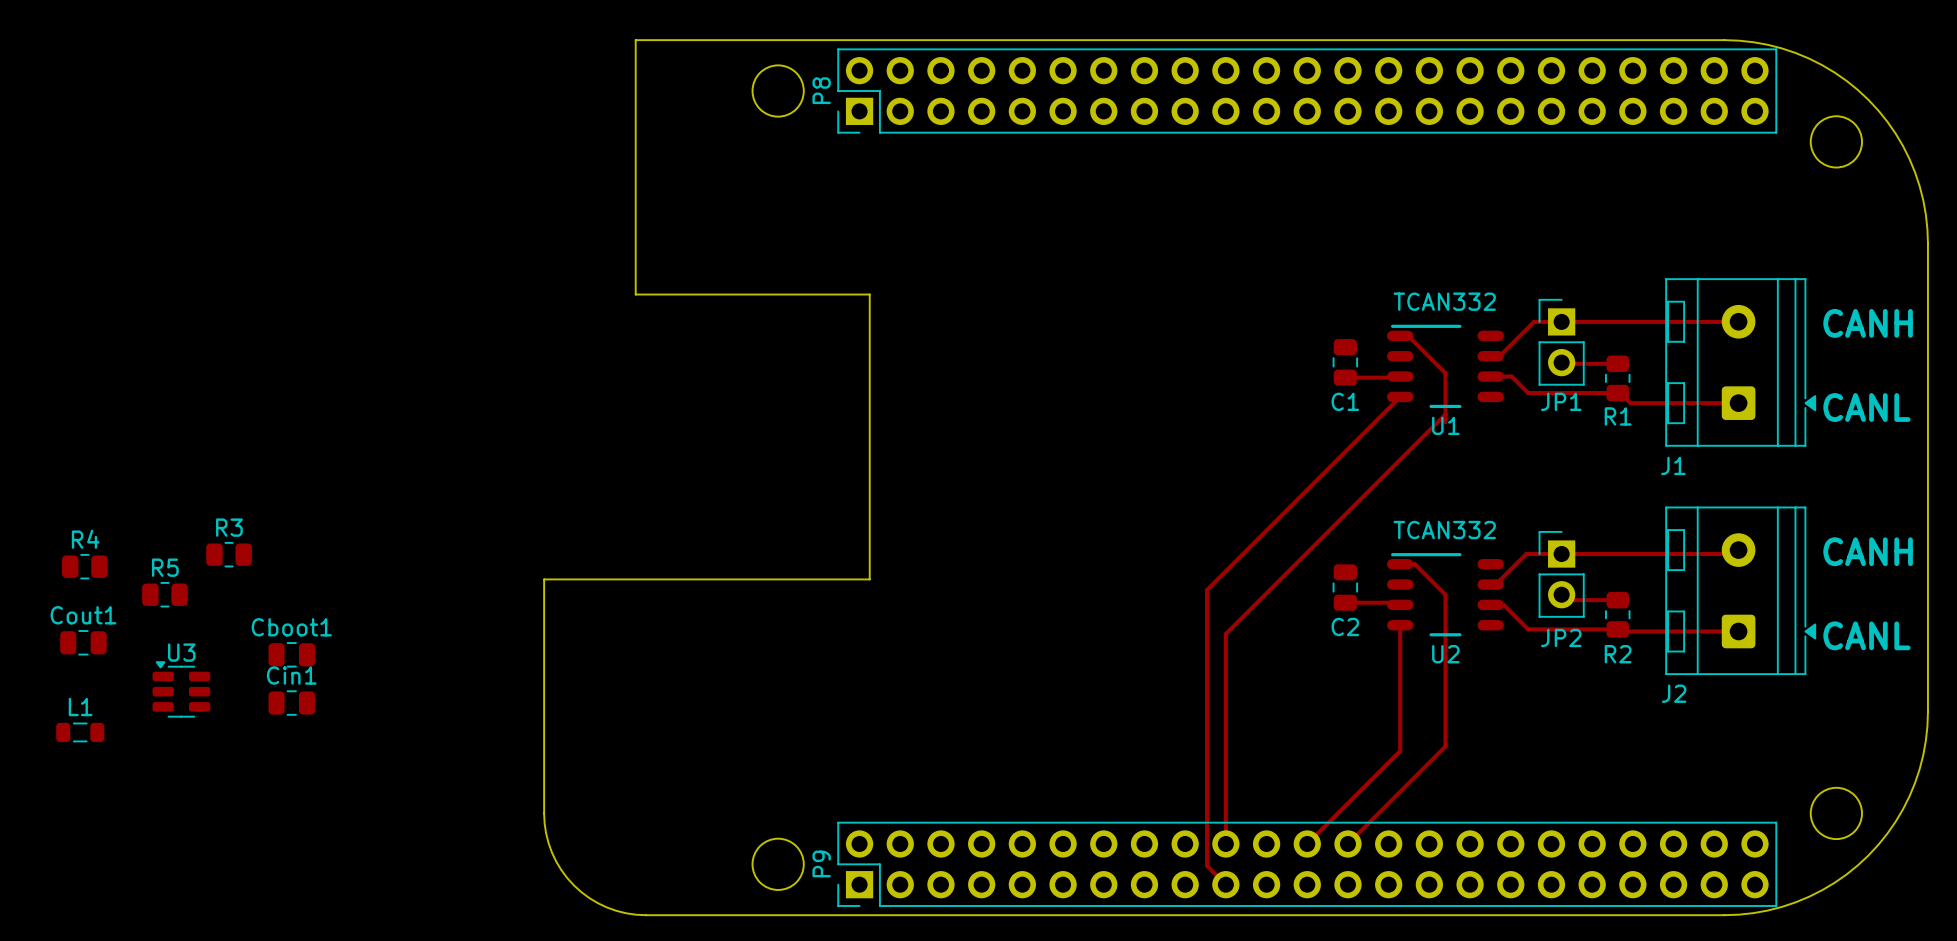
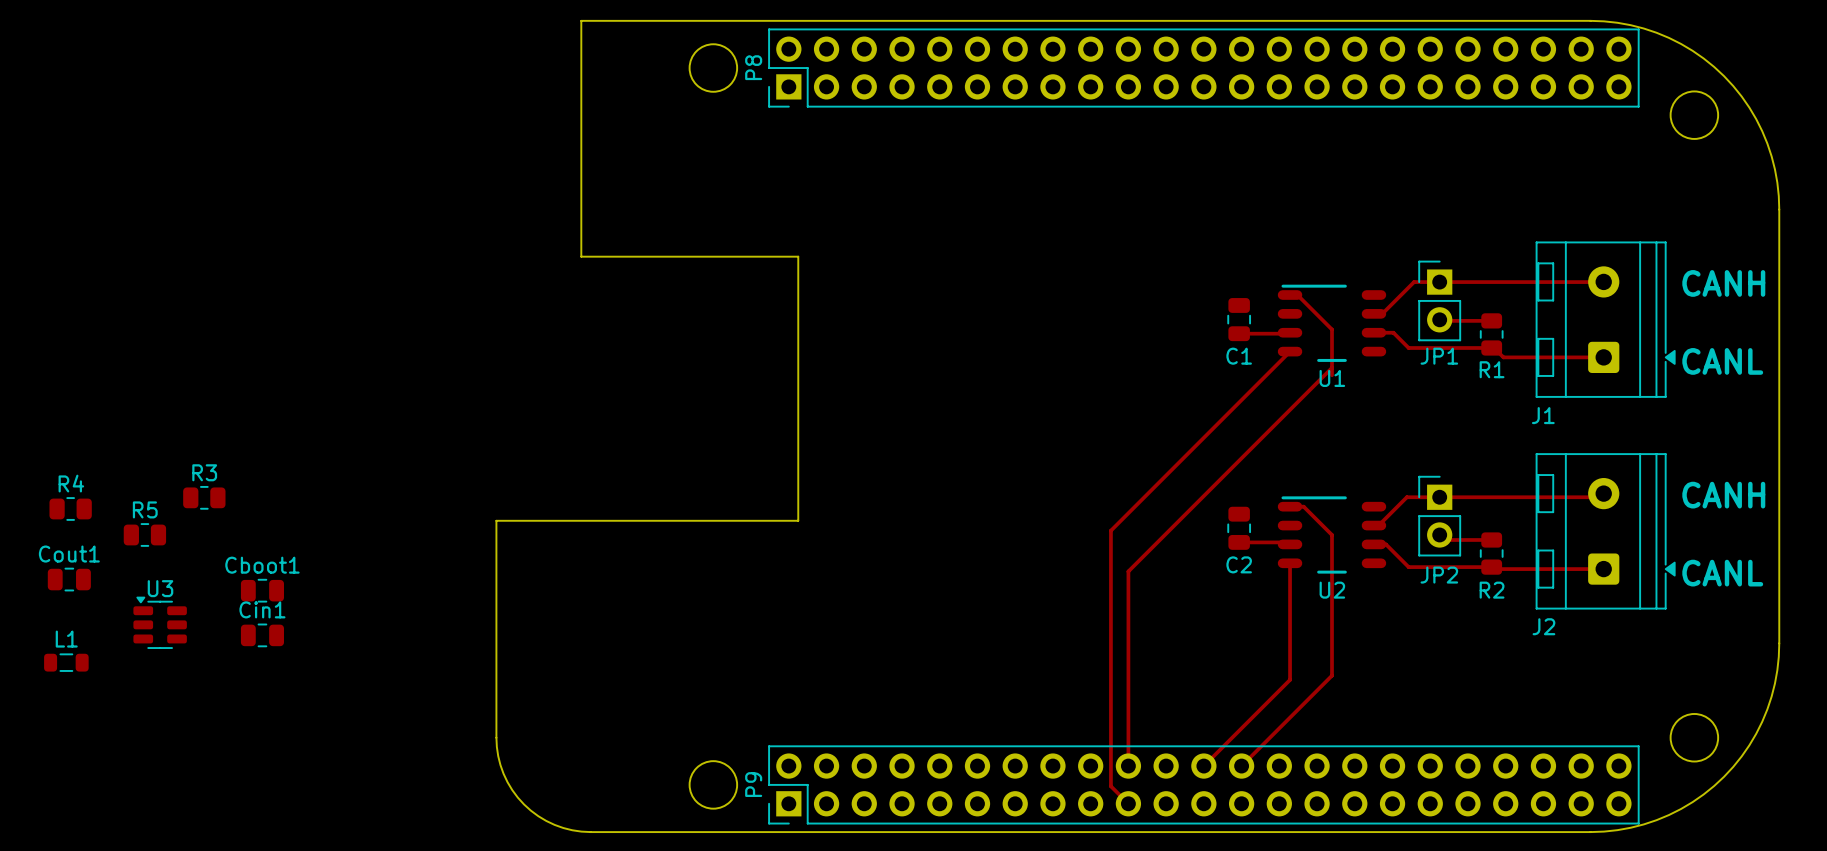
U1 text: TCAN332 (1444, 301) -> none
U2 text: TCAN332 (1444, 530) -> none

